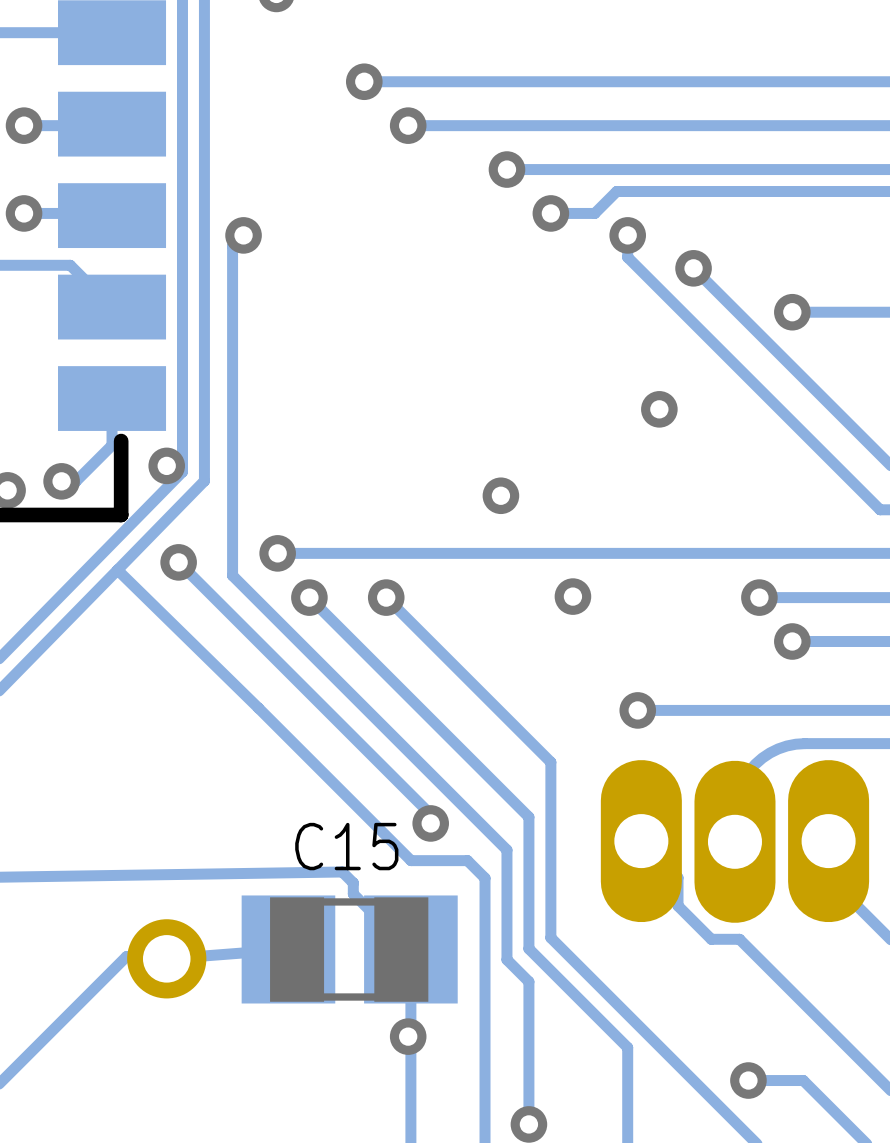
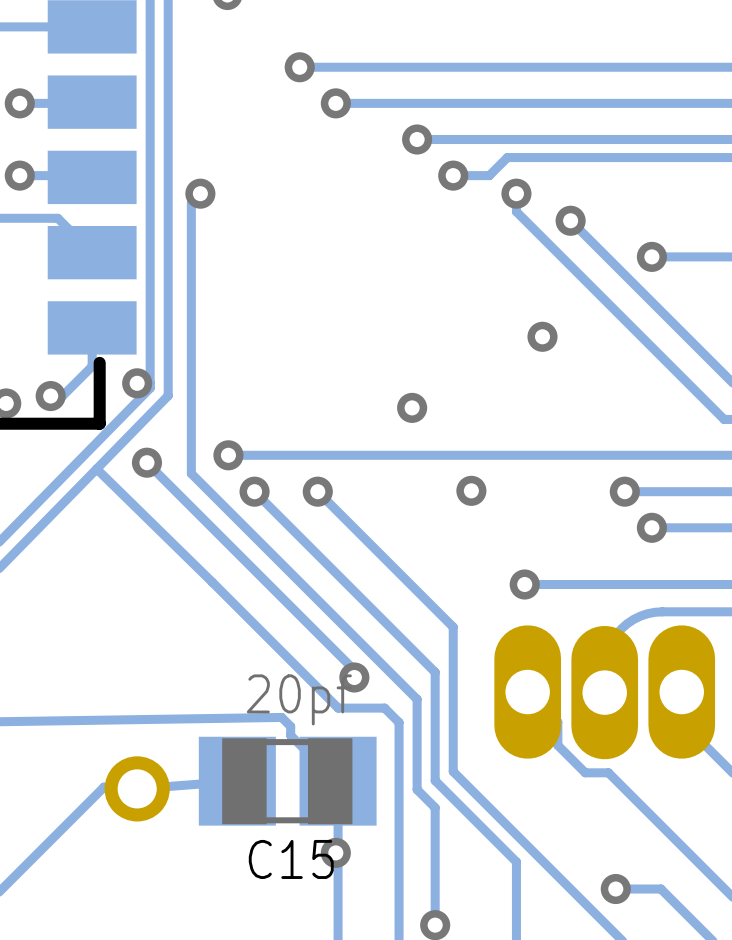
C15 name position: C15 (346, 846) -> C15 (291, 859)
C15 value: none -> 20pf (299, 699)

